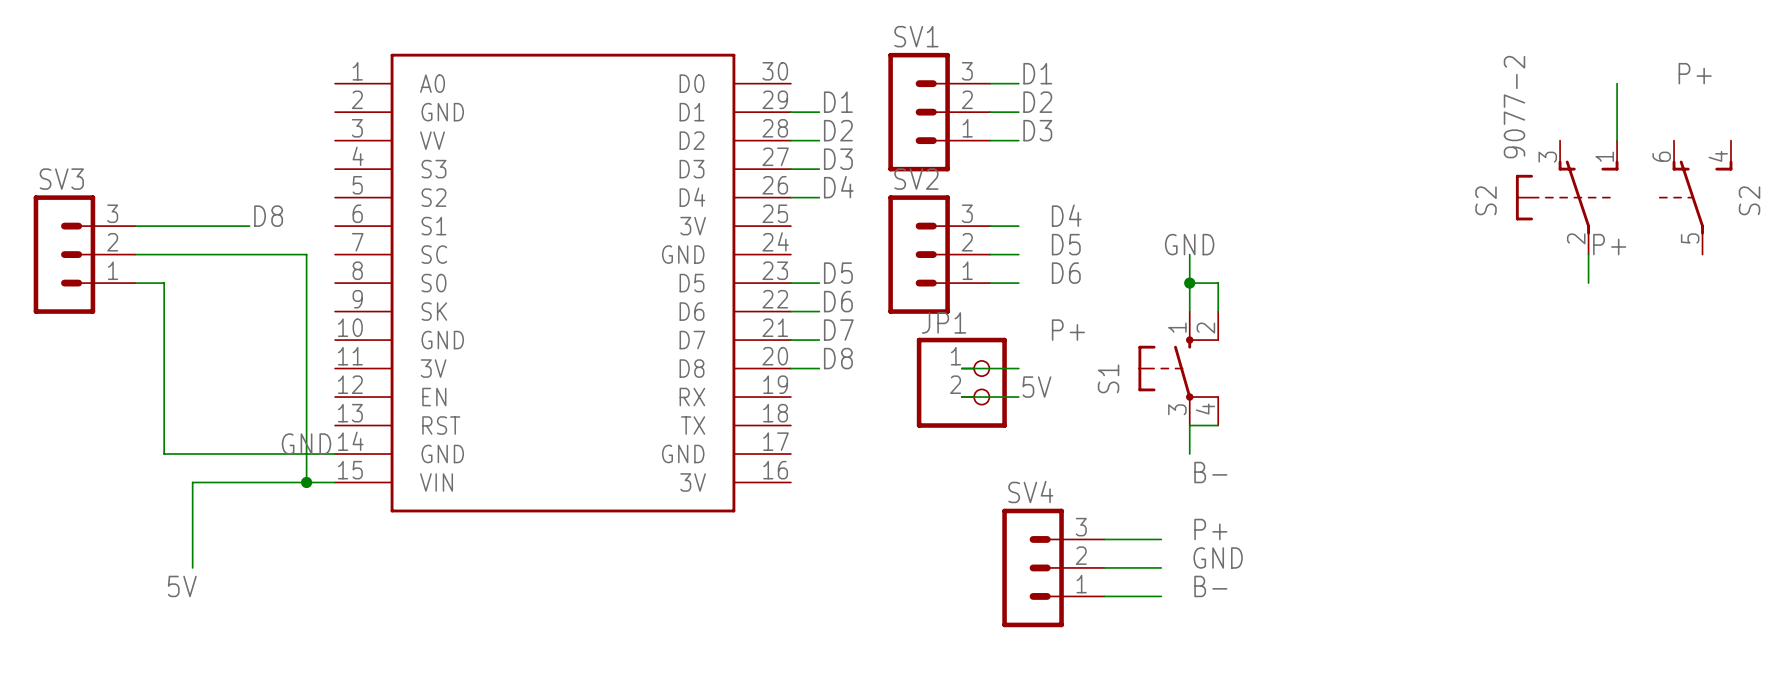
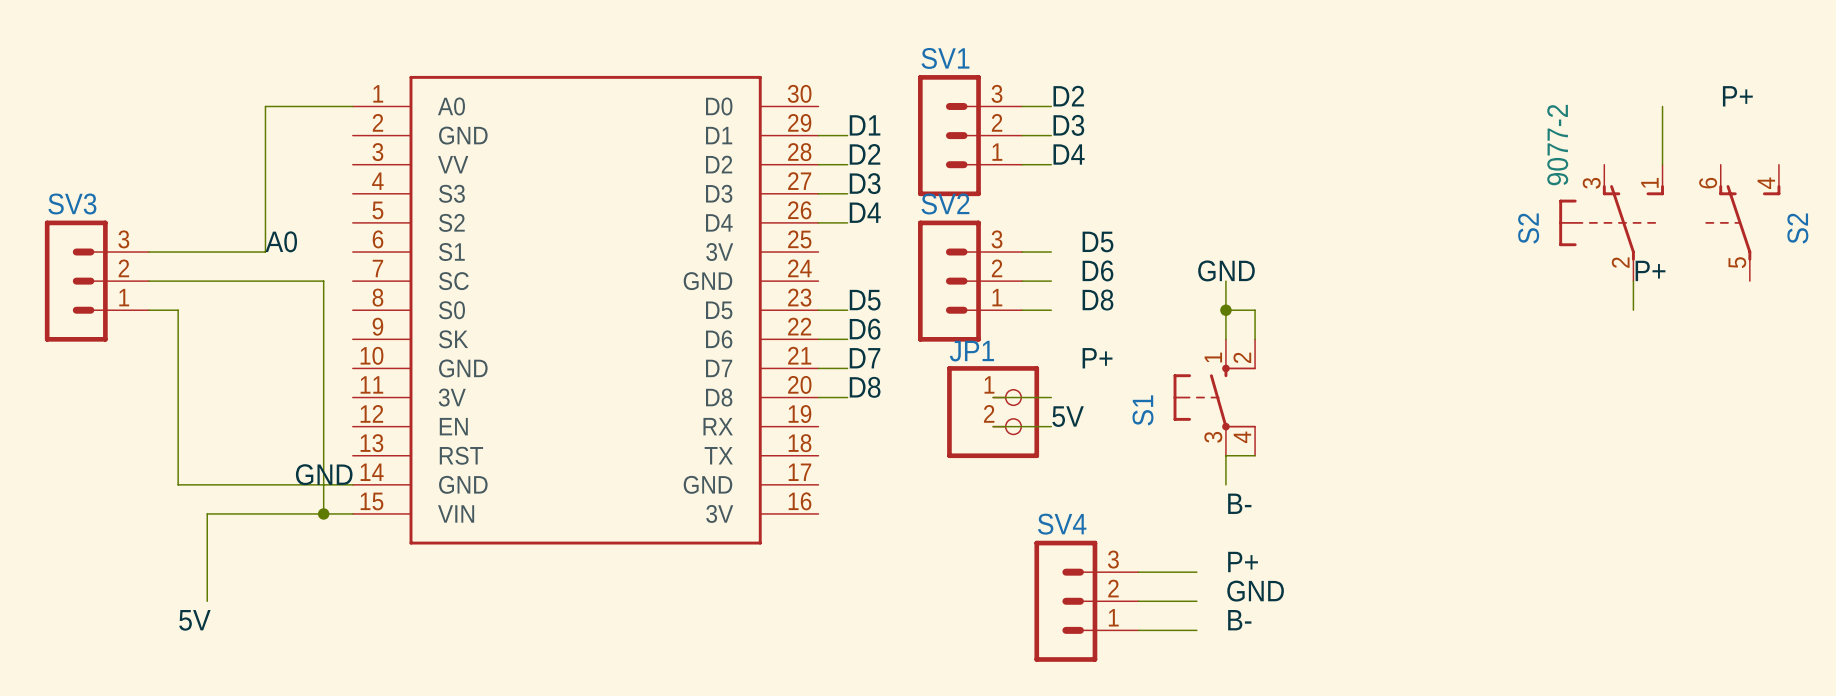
label: D1 (1037, 73) -> D2 (1068, 96)
wire: none -> (352, 106) (265, 106) (265, 252)
label: D2 (1037, 102) -> D3 (1068, 125)
label: D3 (1037, 130) -> D4 (1069, 154)
label: D4 (1066, 215) -> D5 (1097, 241)
label: D8 (268, 216) -> A0 (281, 241)
label: D5 (1066, 244) -> D6 (1097, 270)
label: D6 (1066, 273) -> D8 (1097, 300)

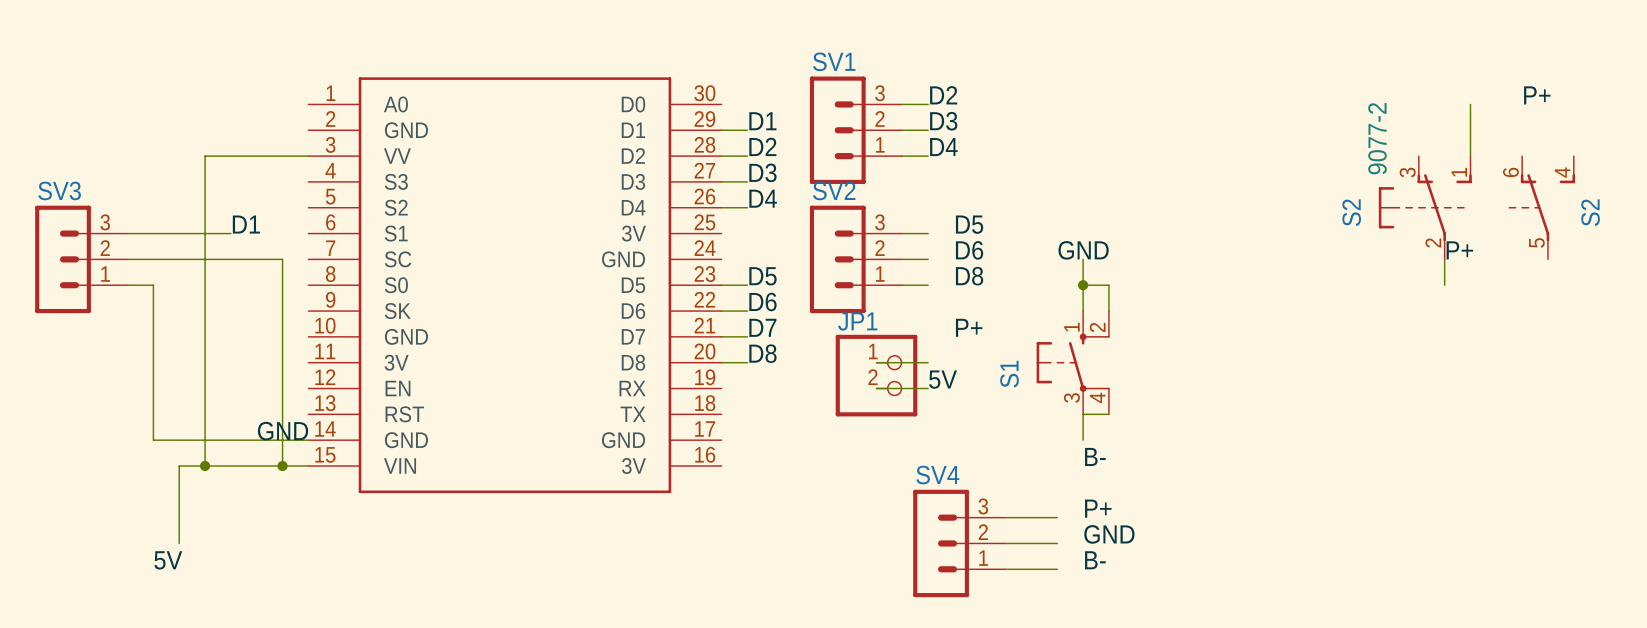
wire: (352, 106) (265, 106) (265, 252) -> none
wire: none -> (308, 156) (205, 156) (205, 465)
label: A0 (281, 241) -> D1 (246, 224)
junction: none -> (205, 465)

